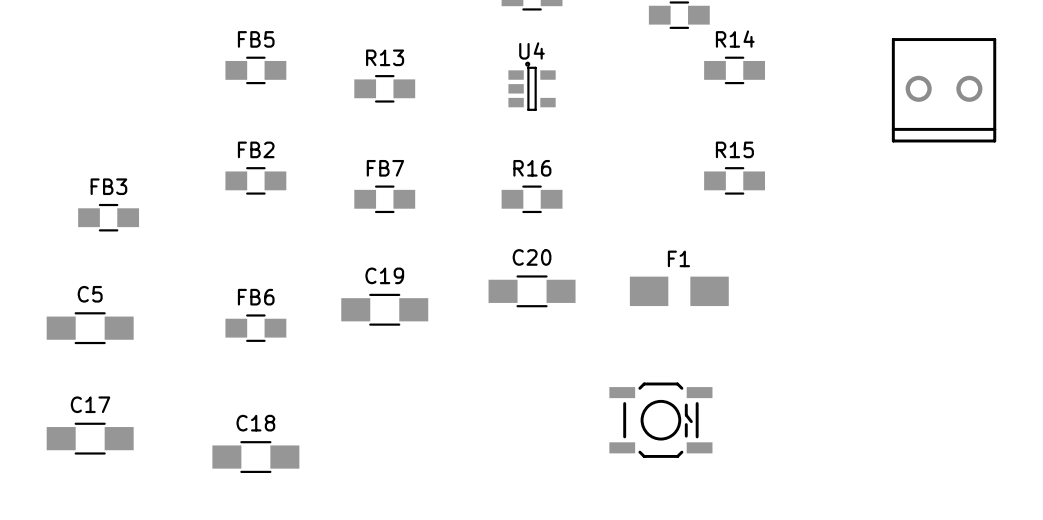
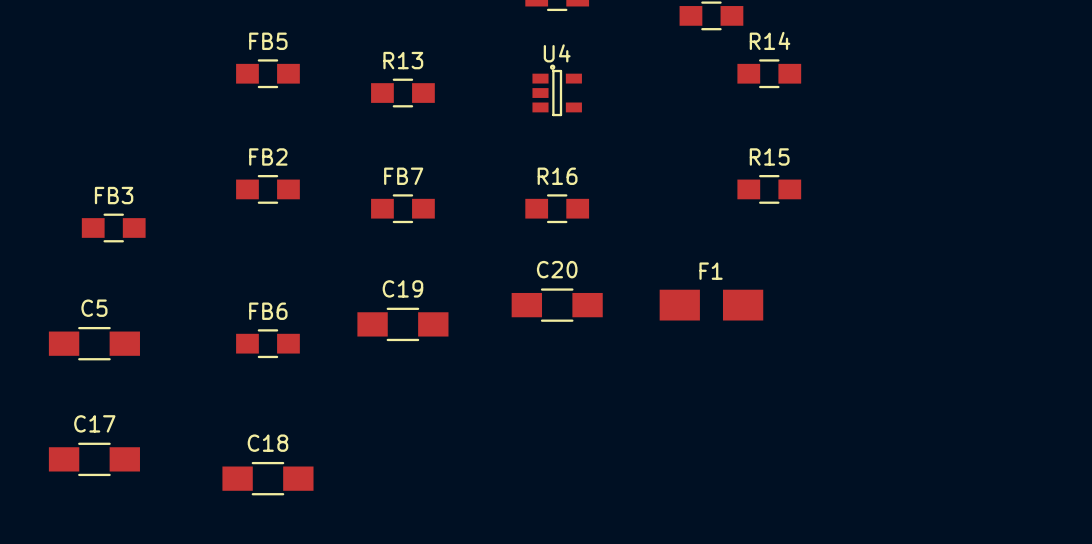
part: (944, 90) -> none
part: (660, 420) -> none

